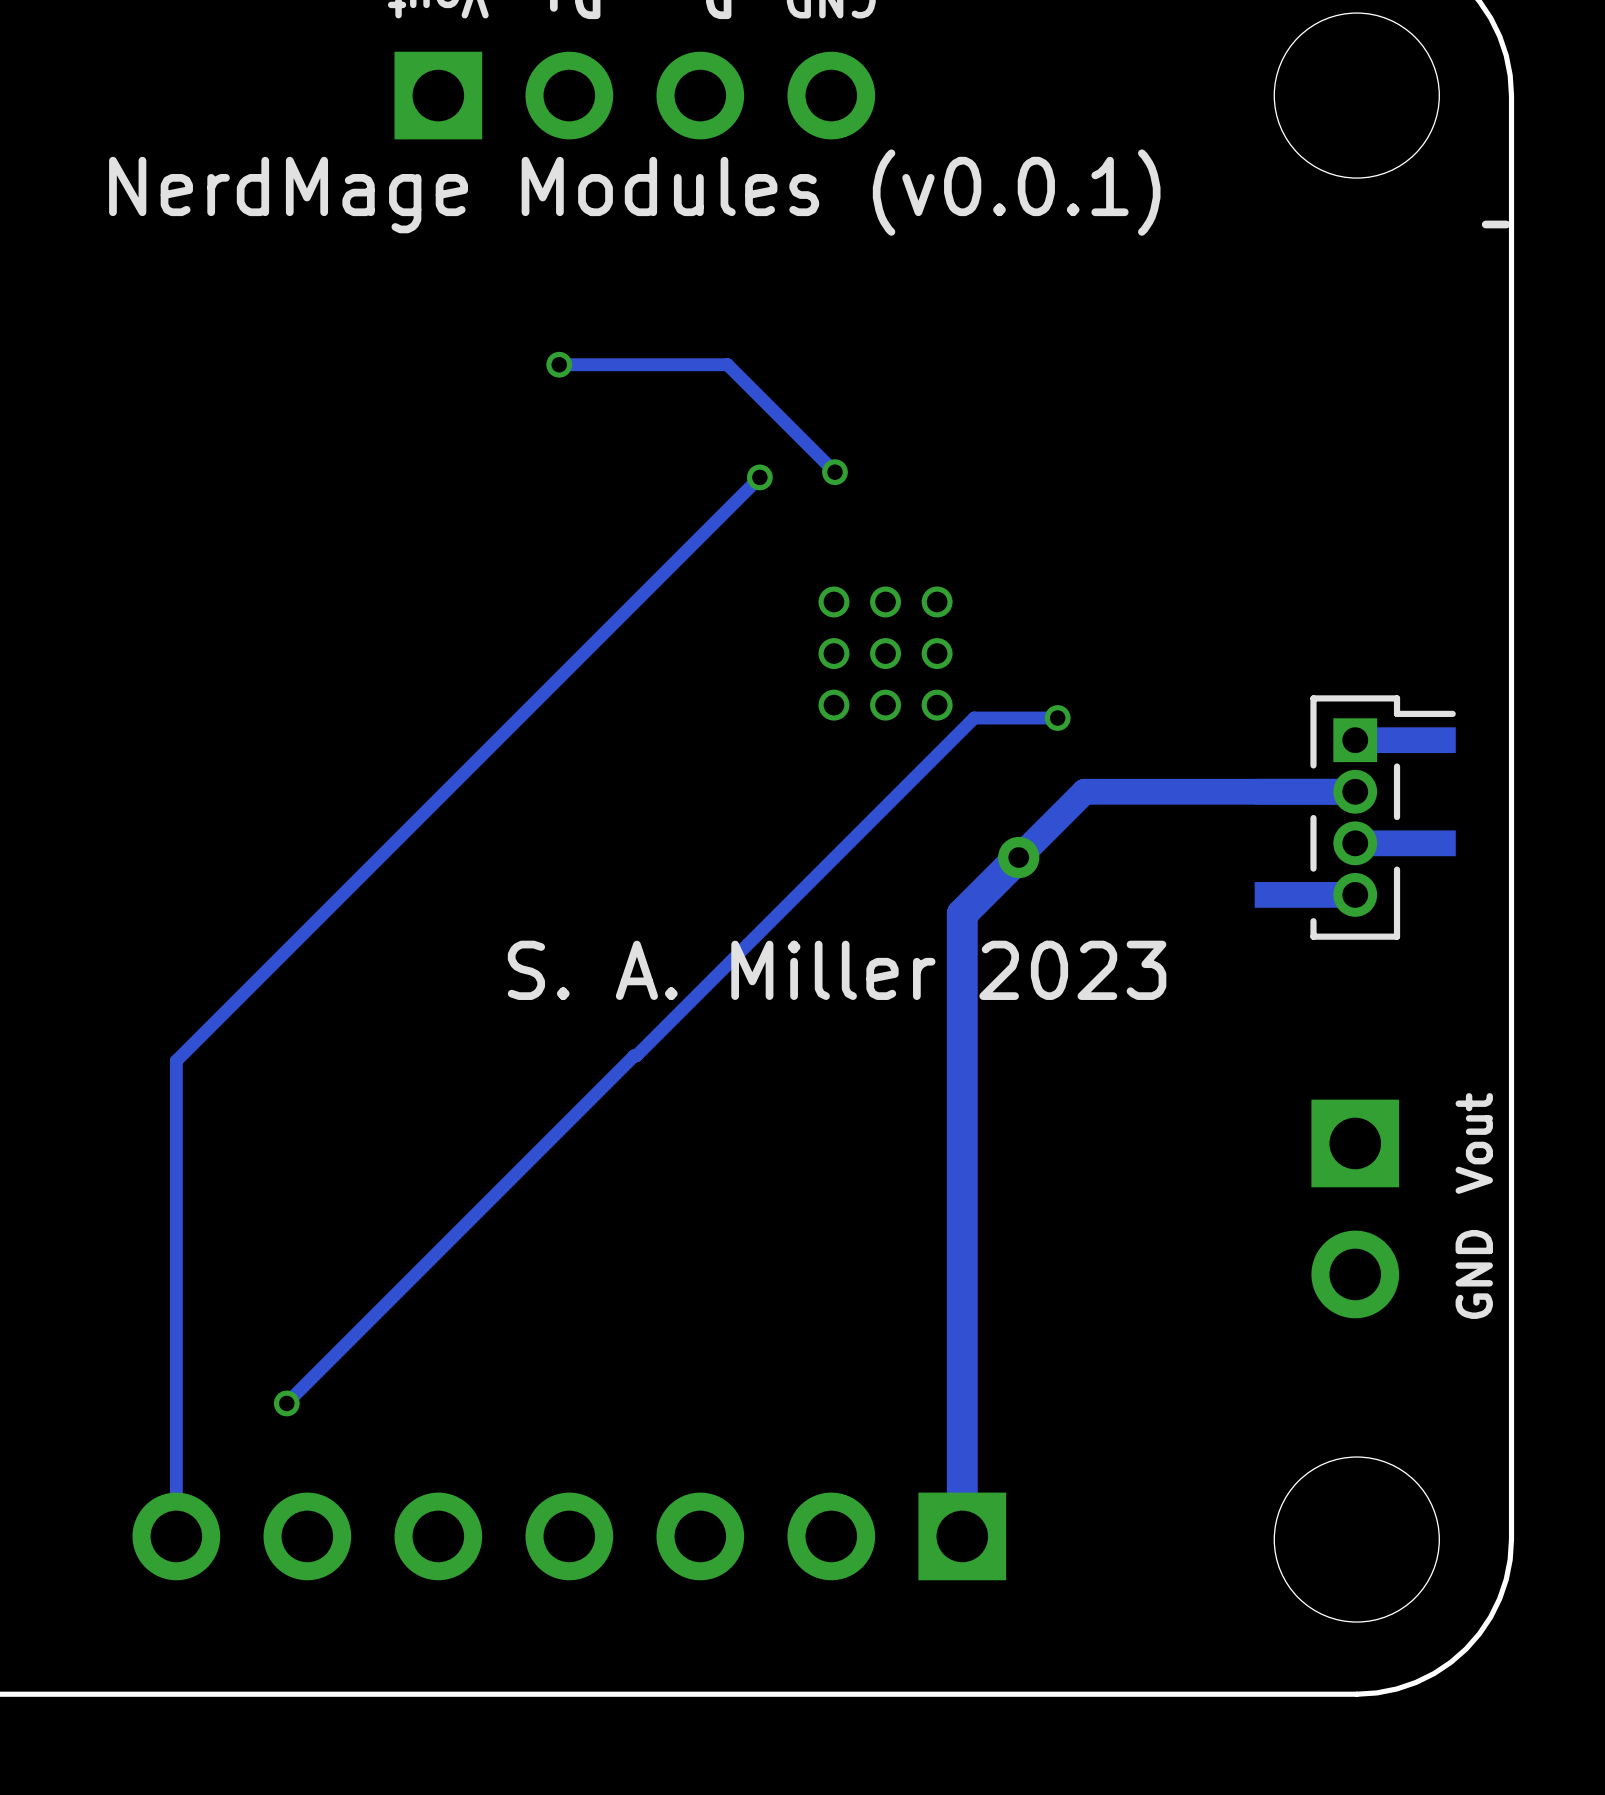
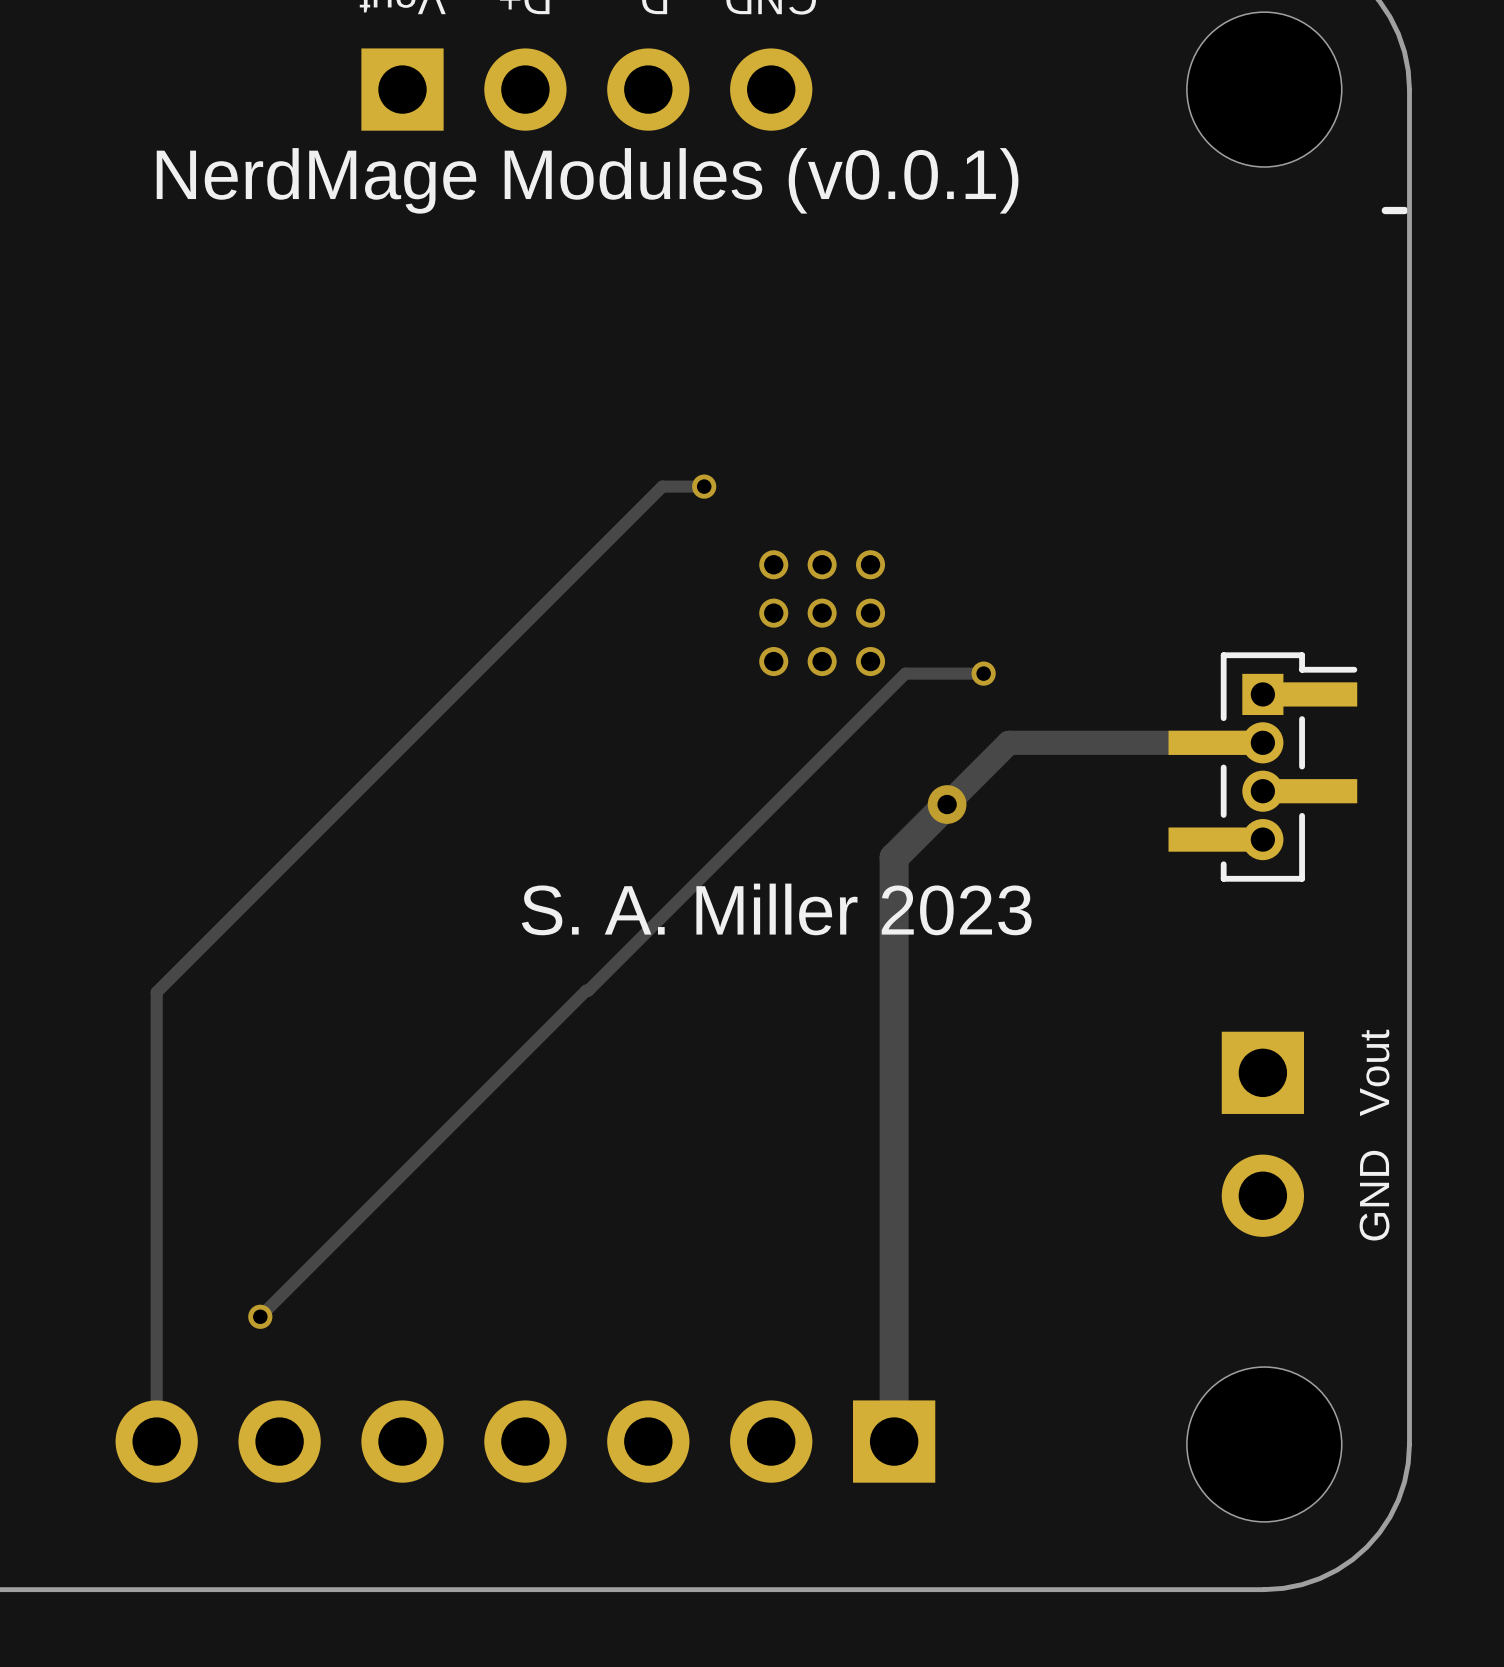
track: (559, 364) (727, 364) (834, 472) -> none
via: (559, 364) -> none
via: (834, 472) -> none
track: (759, 477) (176, 1060) -> (704, 486) (662, 486) (156, 992) (156, 995)
via position: (759, 477) -> (704, 486)

